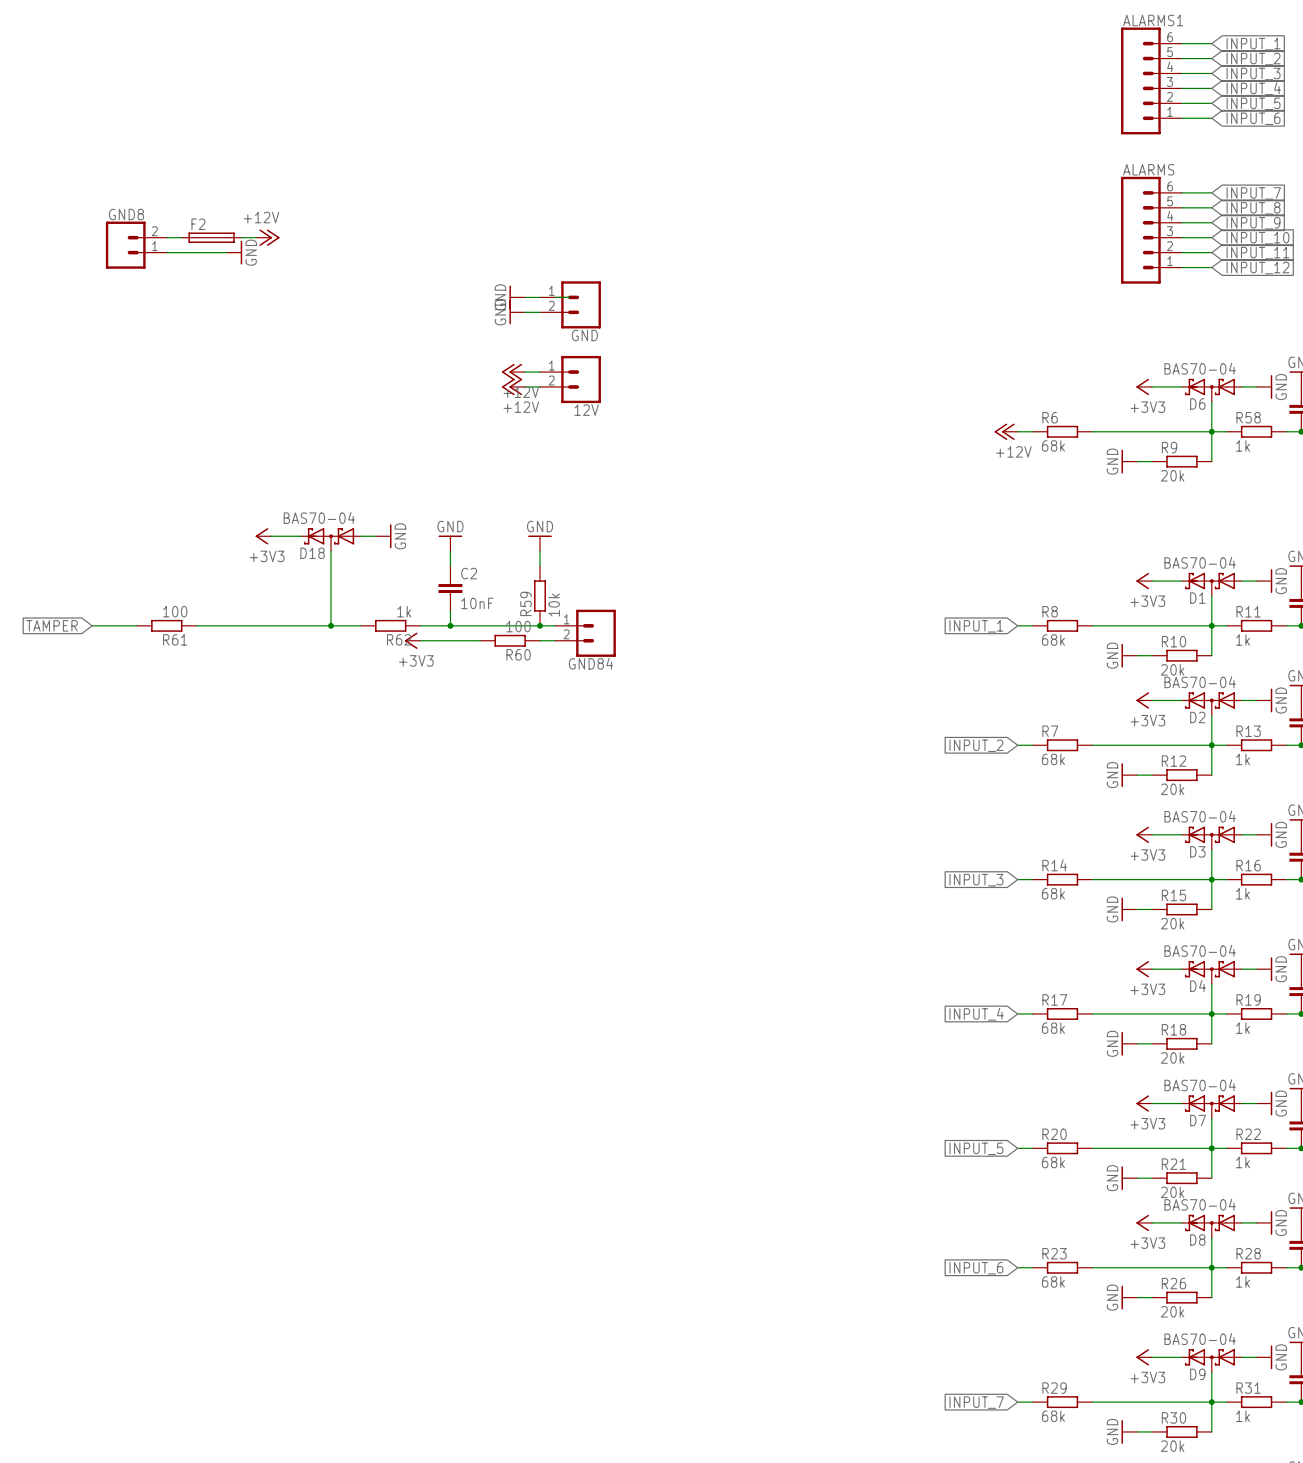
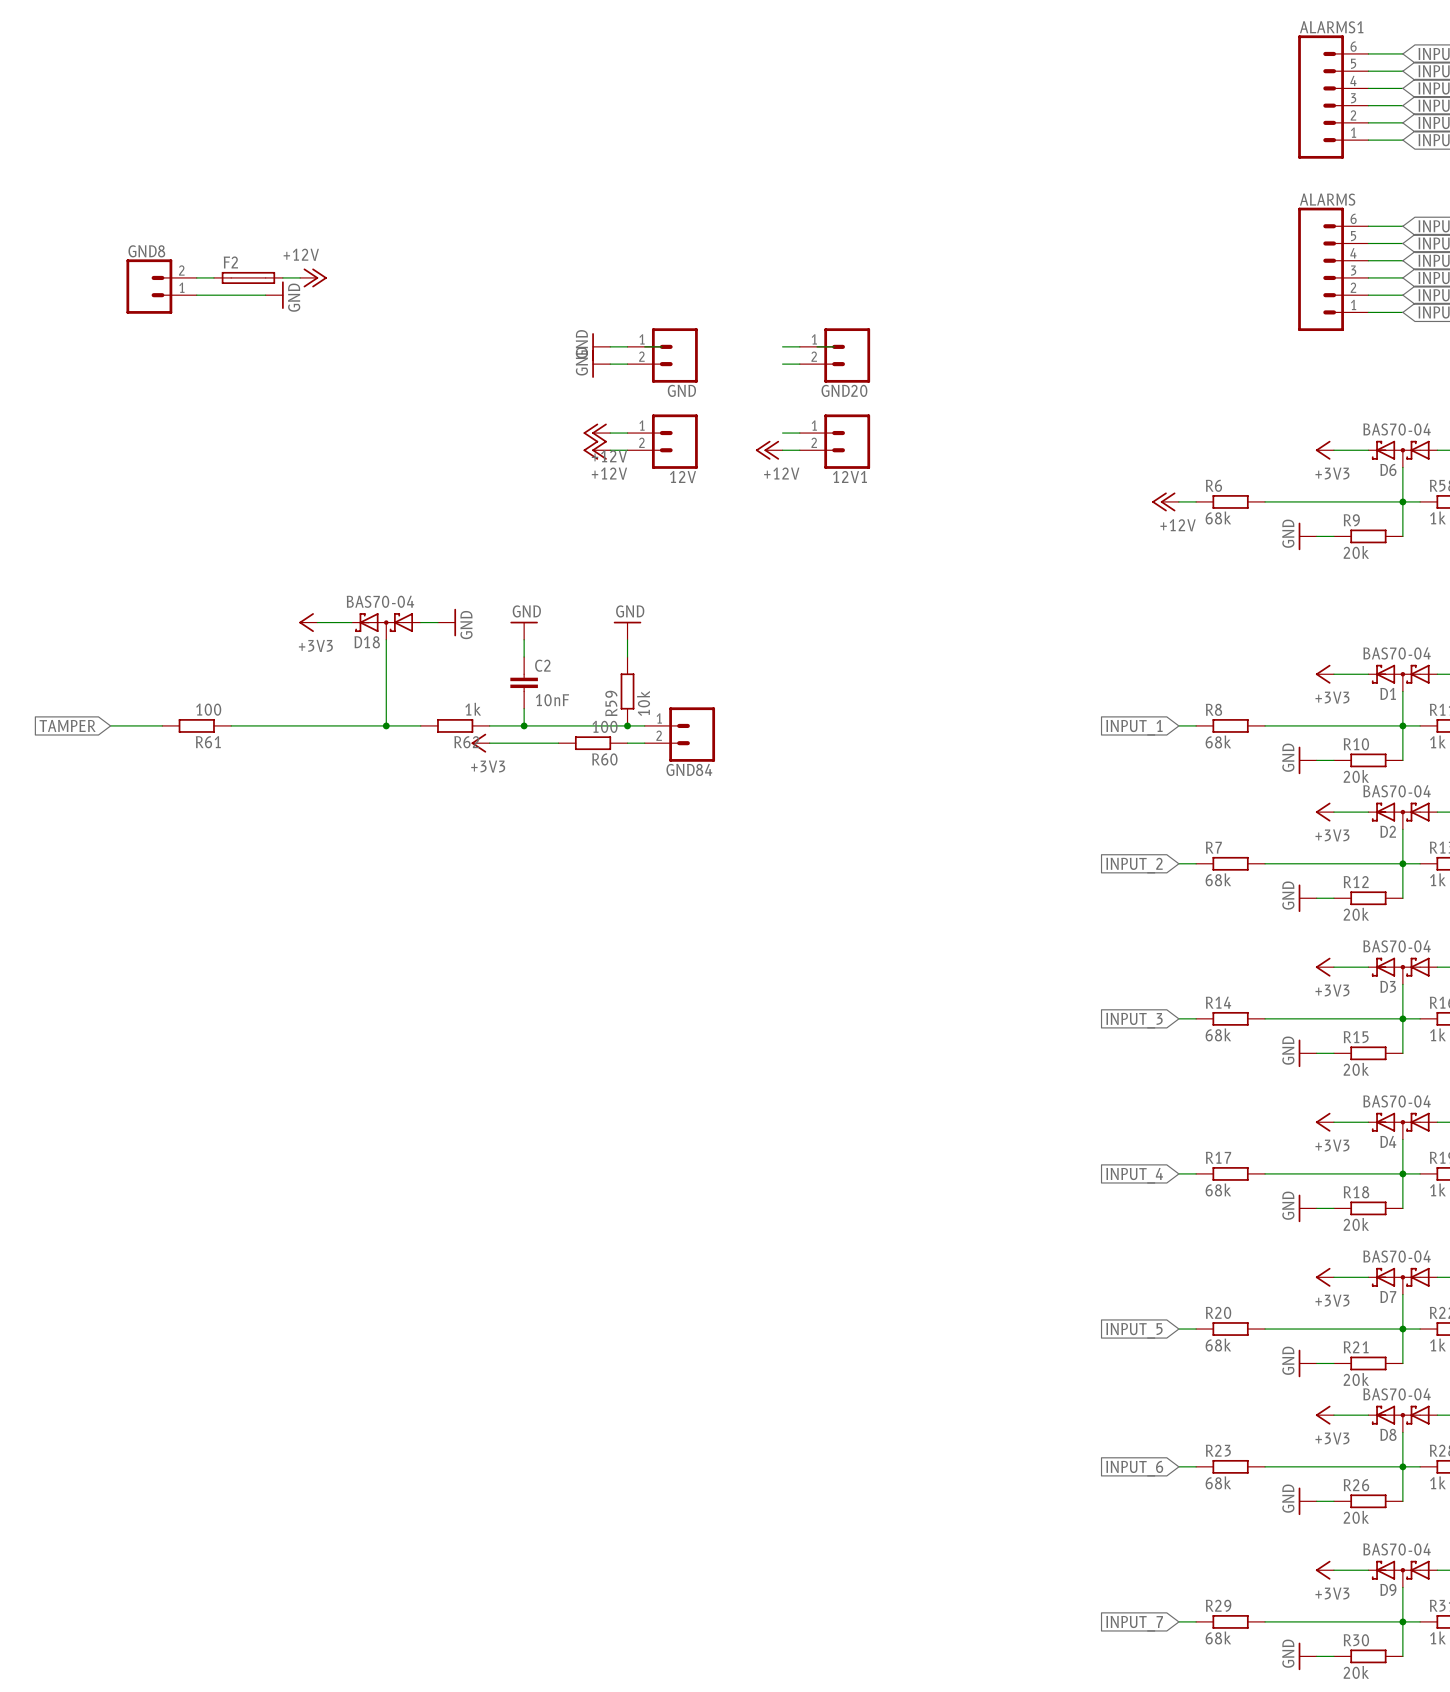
wire: none -> (782, 346) (799, 346)
wire: none -> (817, 346) (834, 346)
GND20: none -> (834, 355)
wire: none -> (782, 364) (799, 364)
wire: none -> (782, 433) (799, 433)
12V1: none -> (834, 441)
power symbol: none -> +12V (769, 450)
wire: none -> (782, 450) (799, 450)

